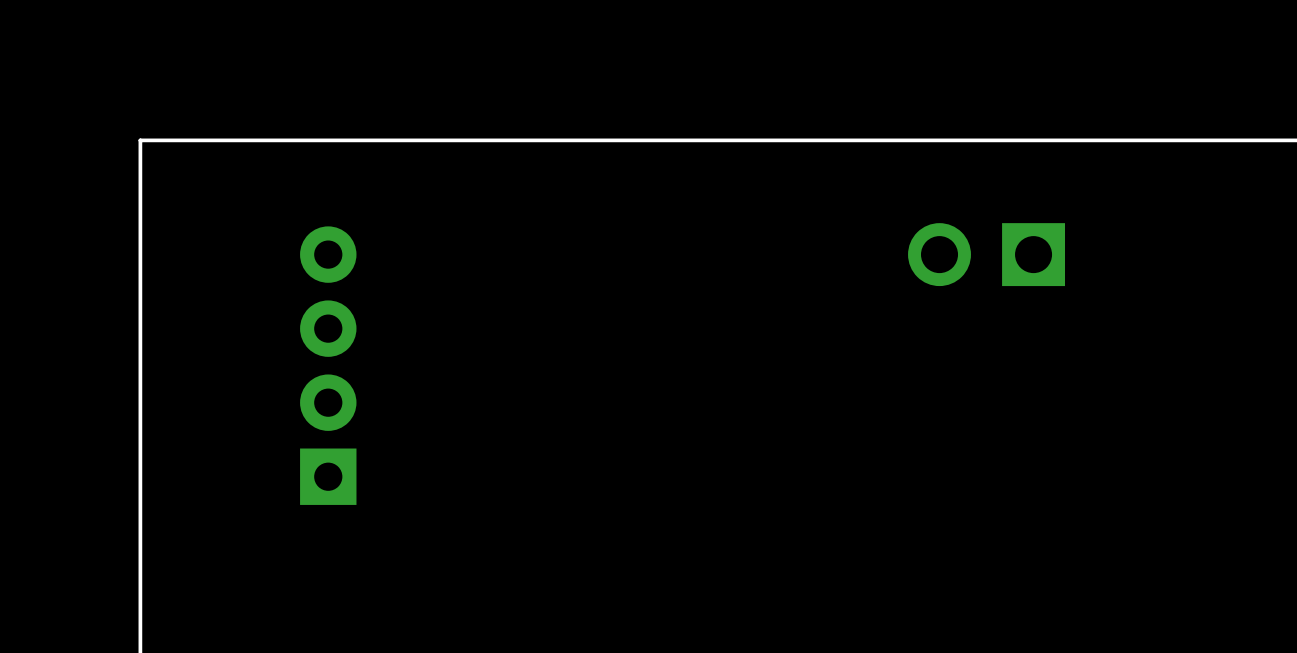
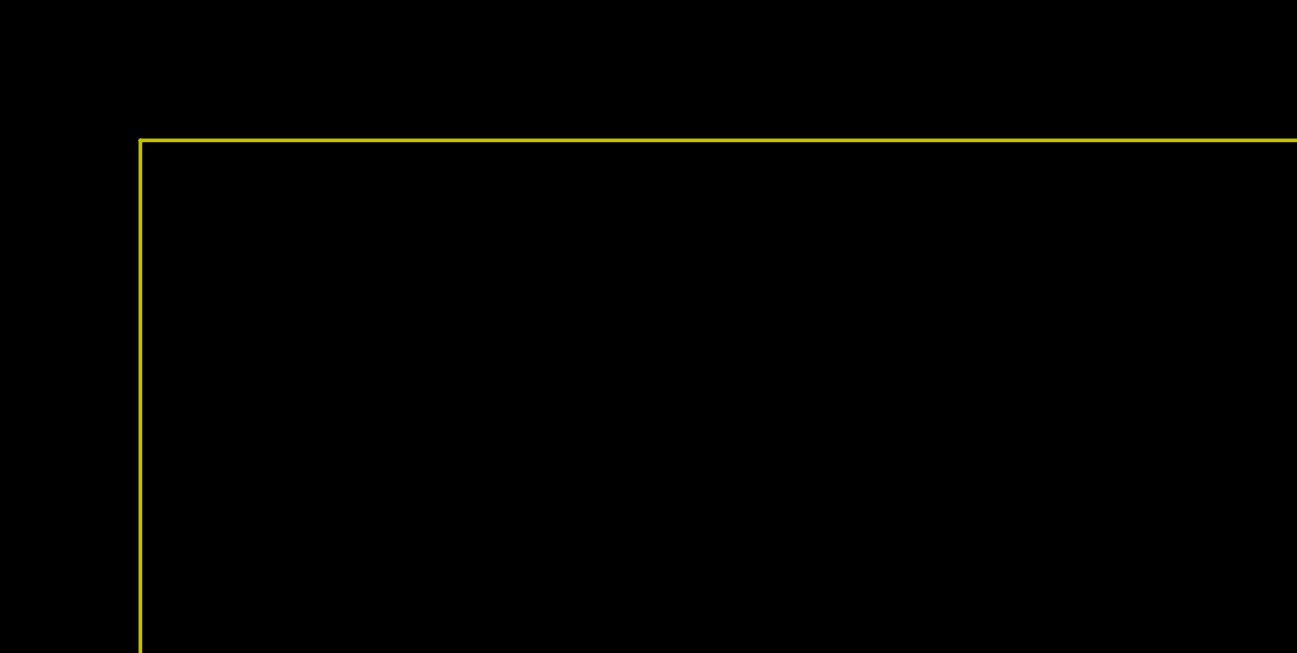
part: (986, 254) -> none
part: (328, 365) -> none

